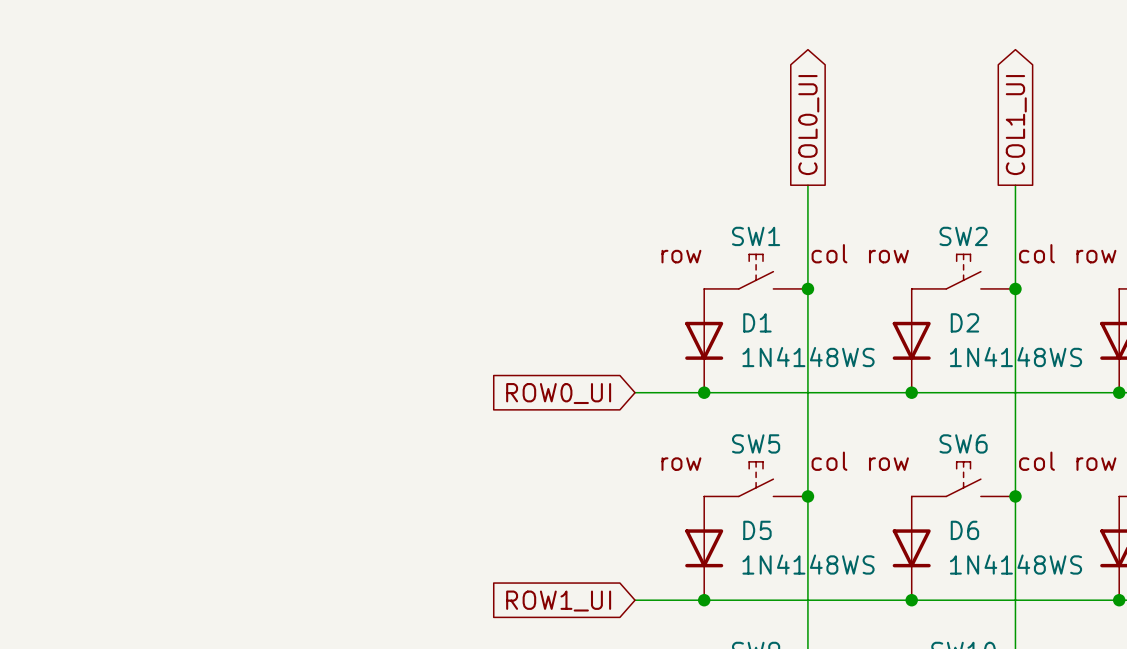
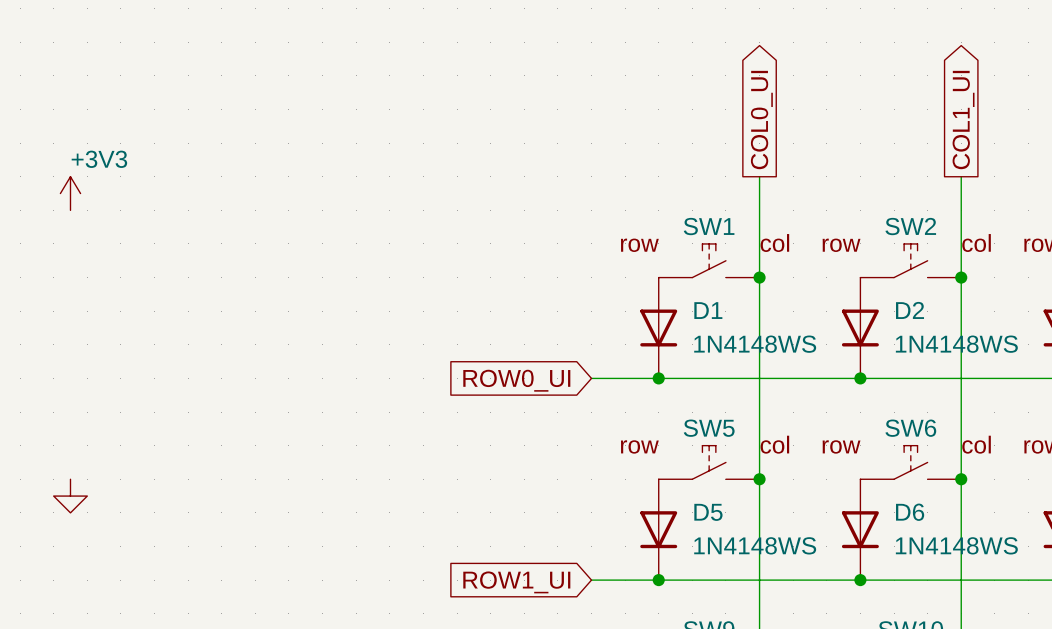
power symbol: none -> +3V3 (70, 193)
power symbol: none -> (70, 496)

